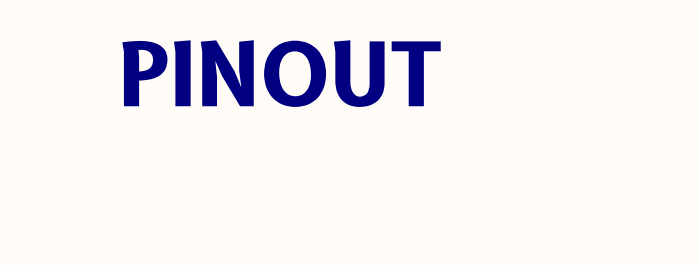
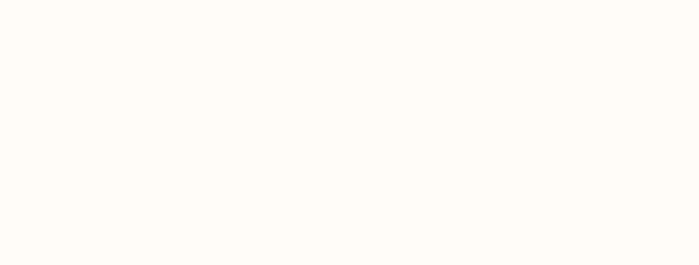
text: PINOUT (281, 73) -> none

